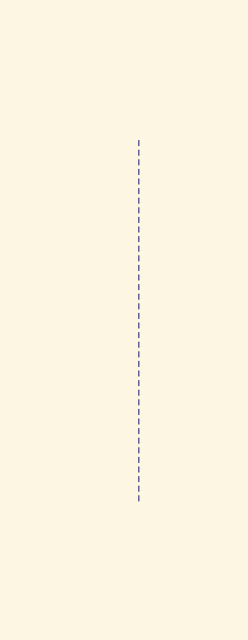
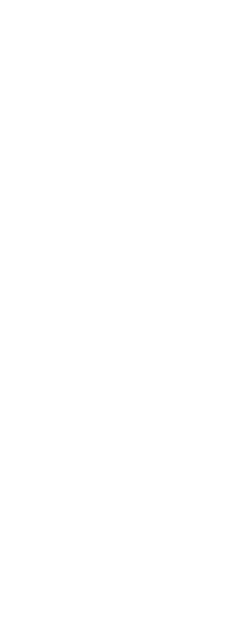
line: (138, 138) (138, 501) -> none

